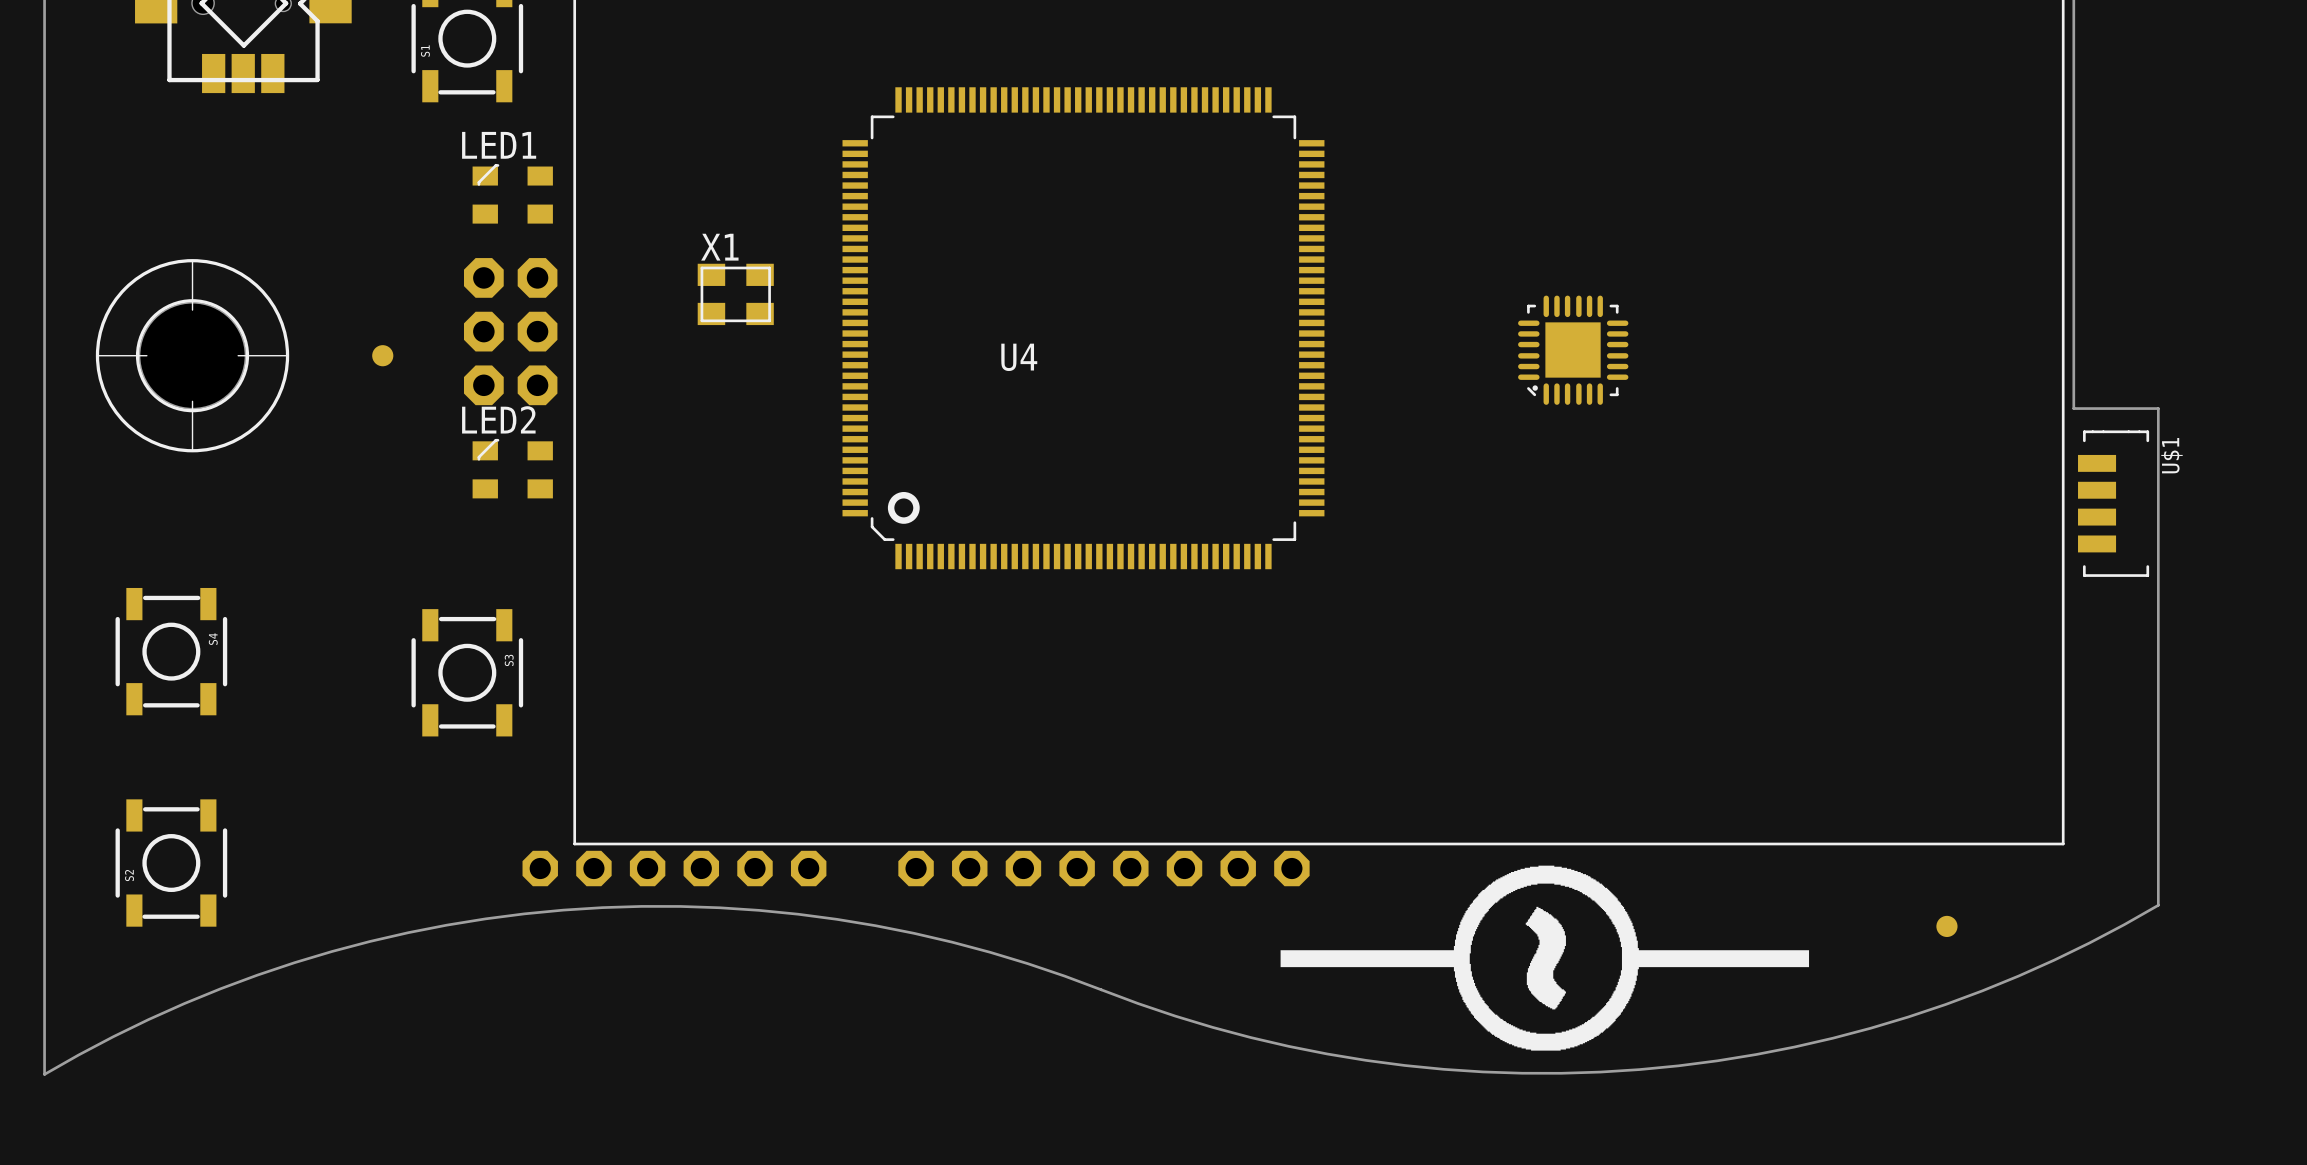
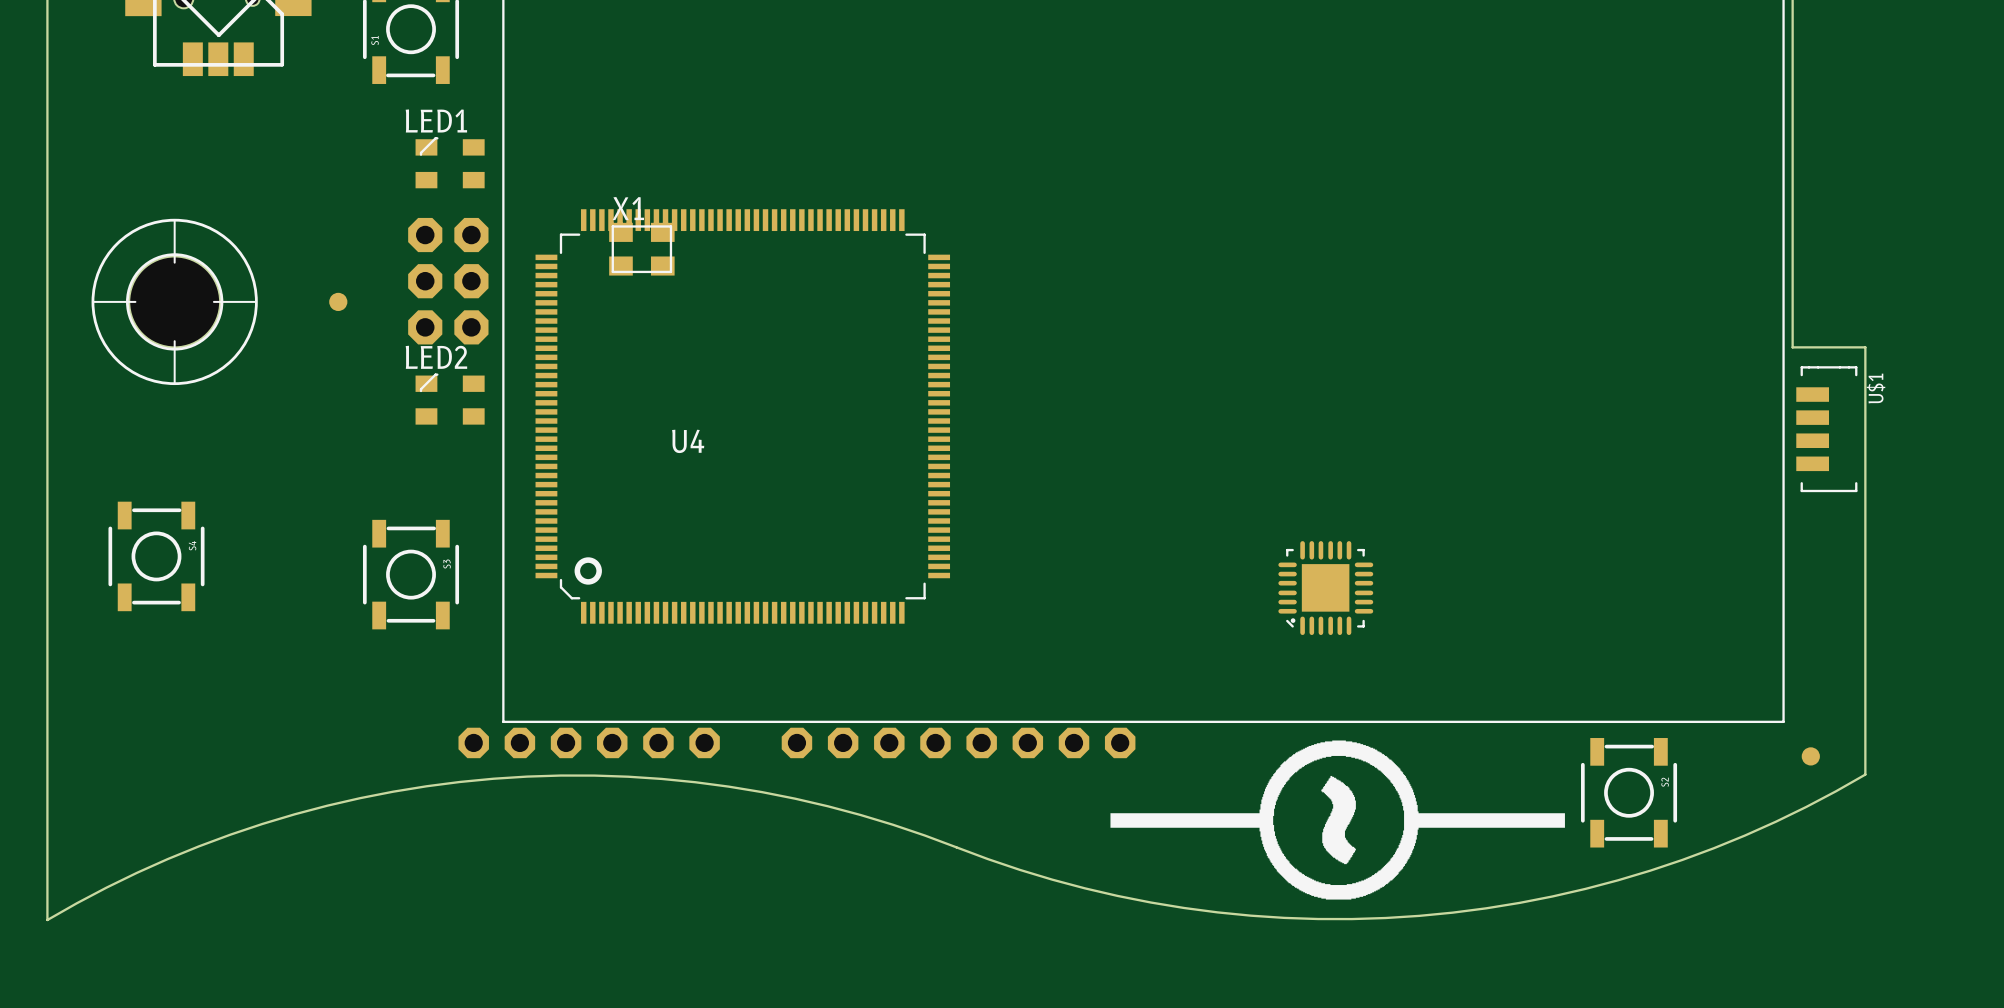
U4 position: (1083, 328) -> (742, 416)
part position: (1573, 350) -> (1325, 588)
S2 rotation: 0° (171, 863) -> 180° (1629, 792)
S2 position: (171, 863) -> (1629, 792)
part position: (1946, 926) -> (1810, 756)

